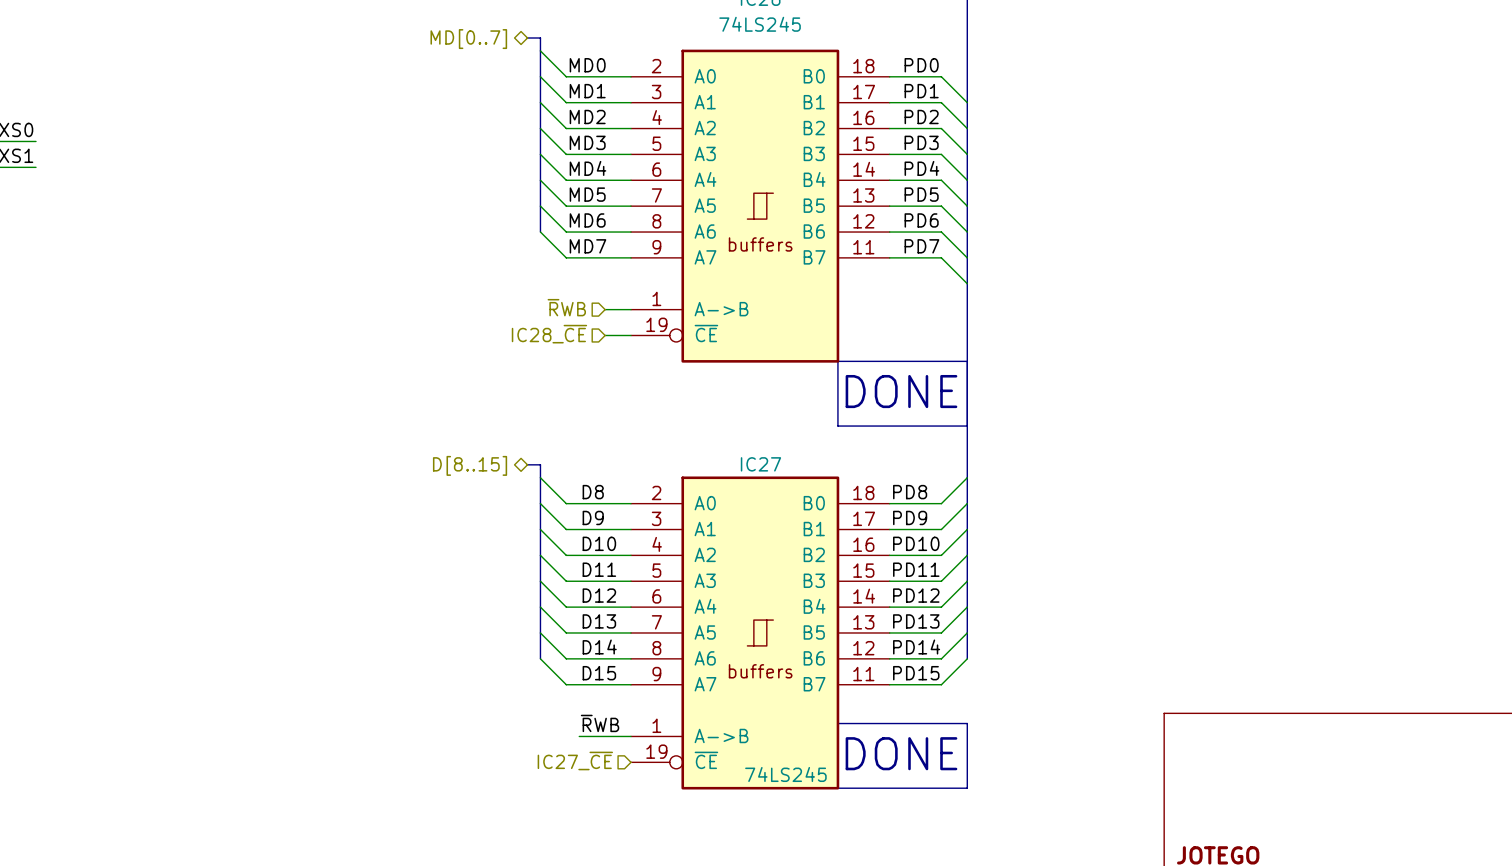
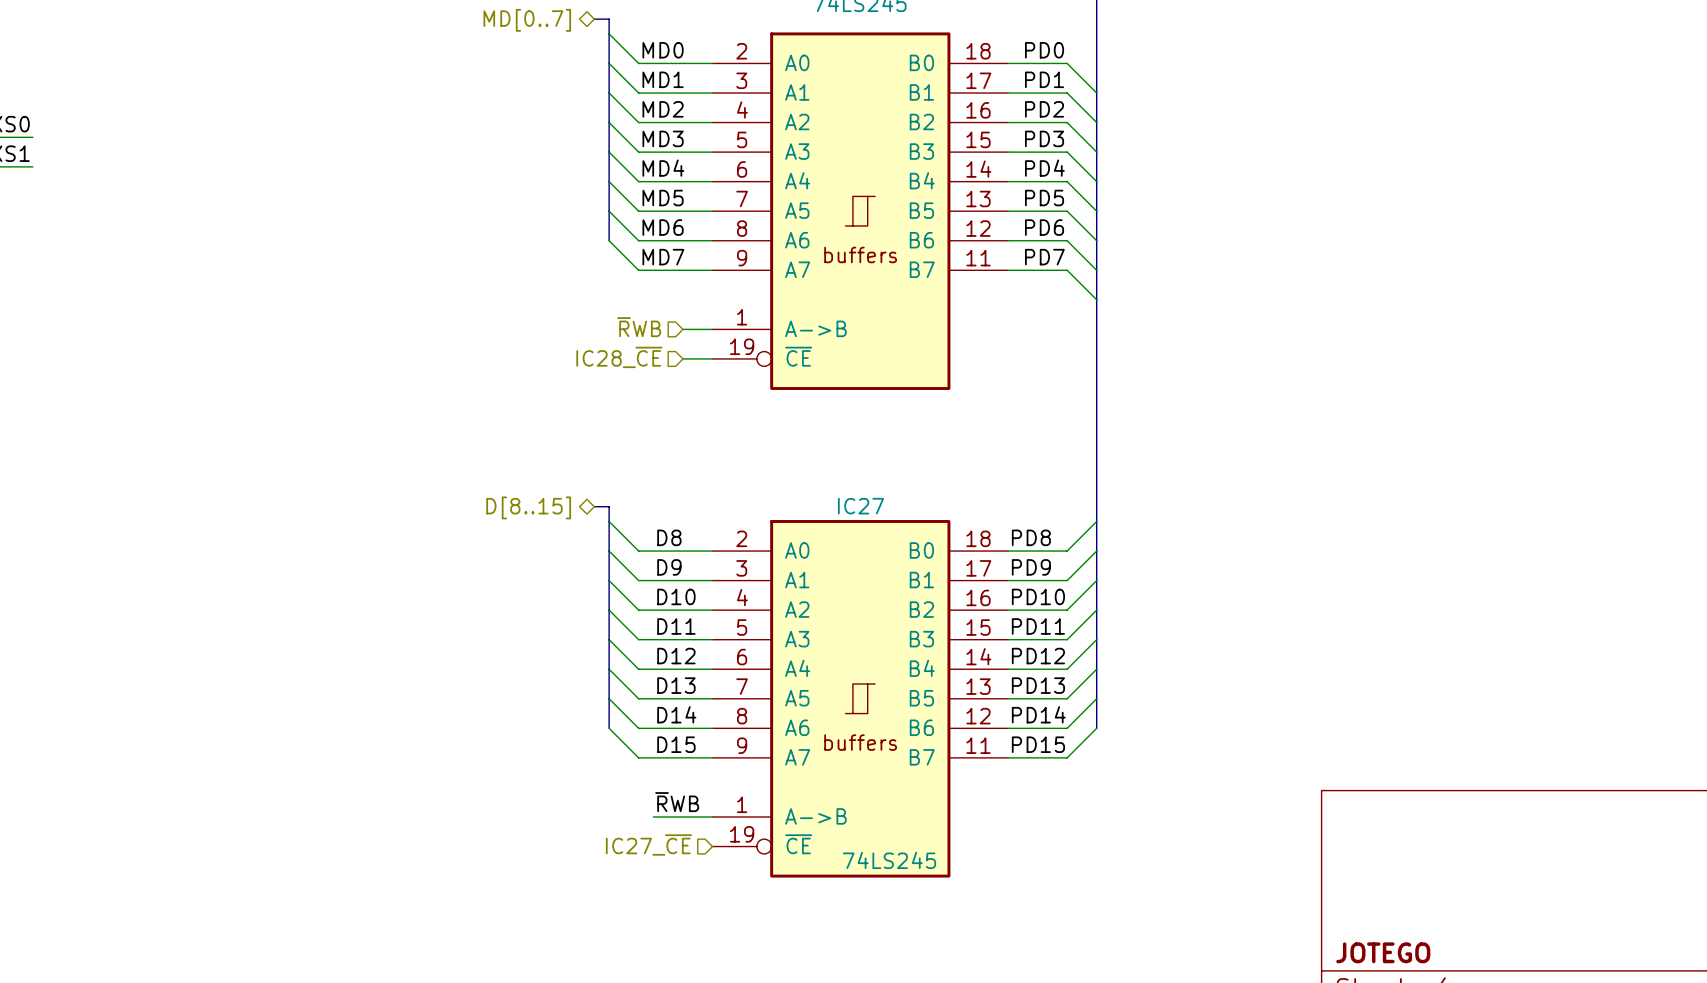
line: (837, 361) (837, 426) (967, 426) (967, 361) (837, 361) -> none
text: DONE (901, 391) -> none
line: (837, 723) (967, 723) (967, 788) (837, 788) (837, 723) -> none
text: DONE (901, 753) -> none

